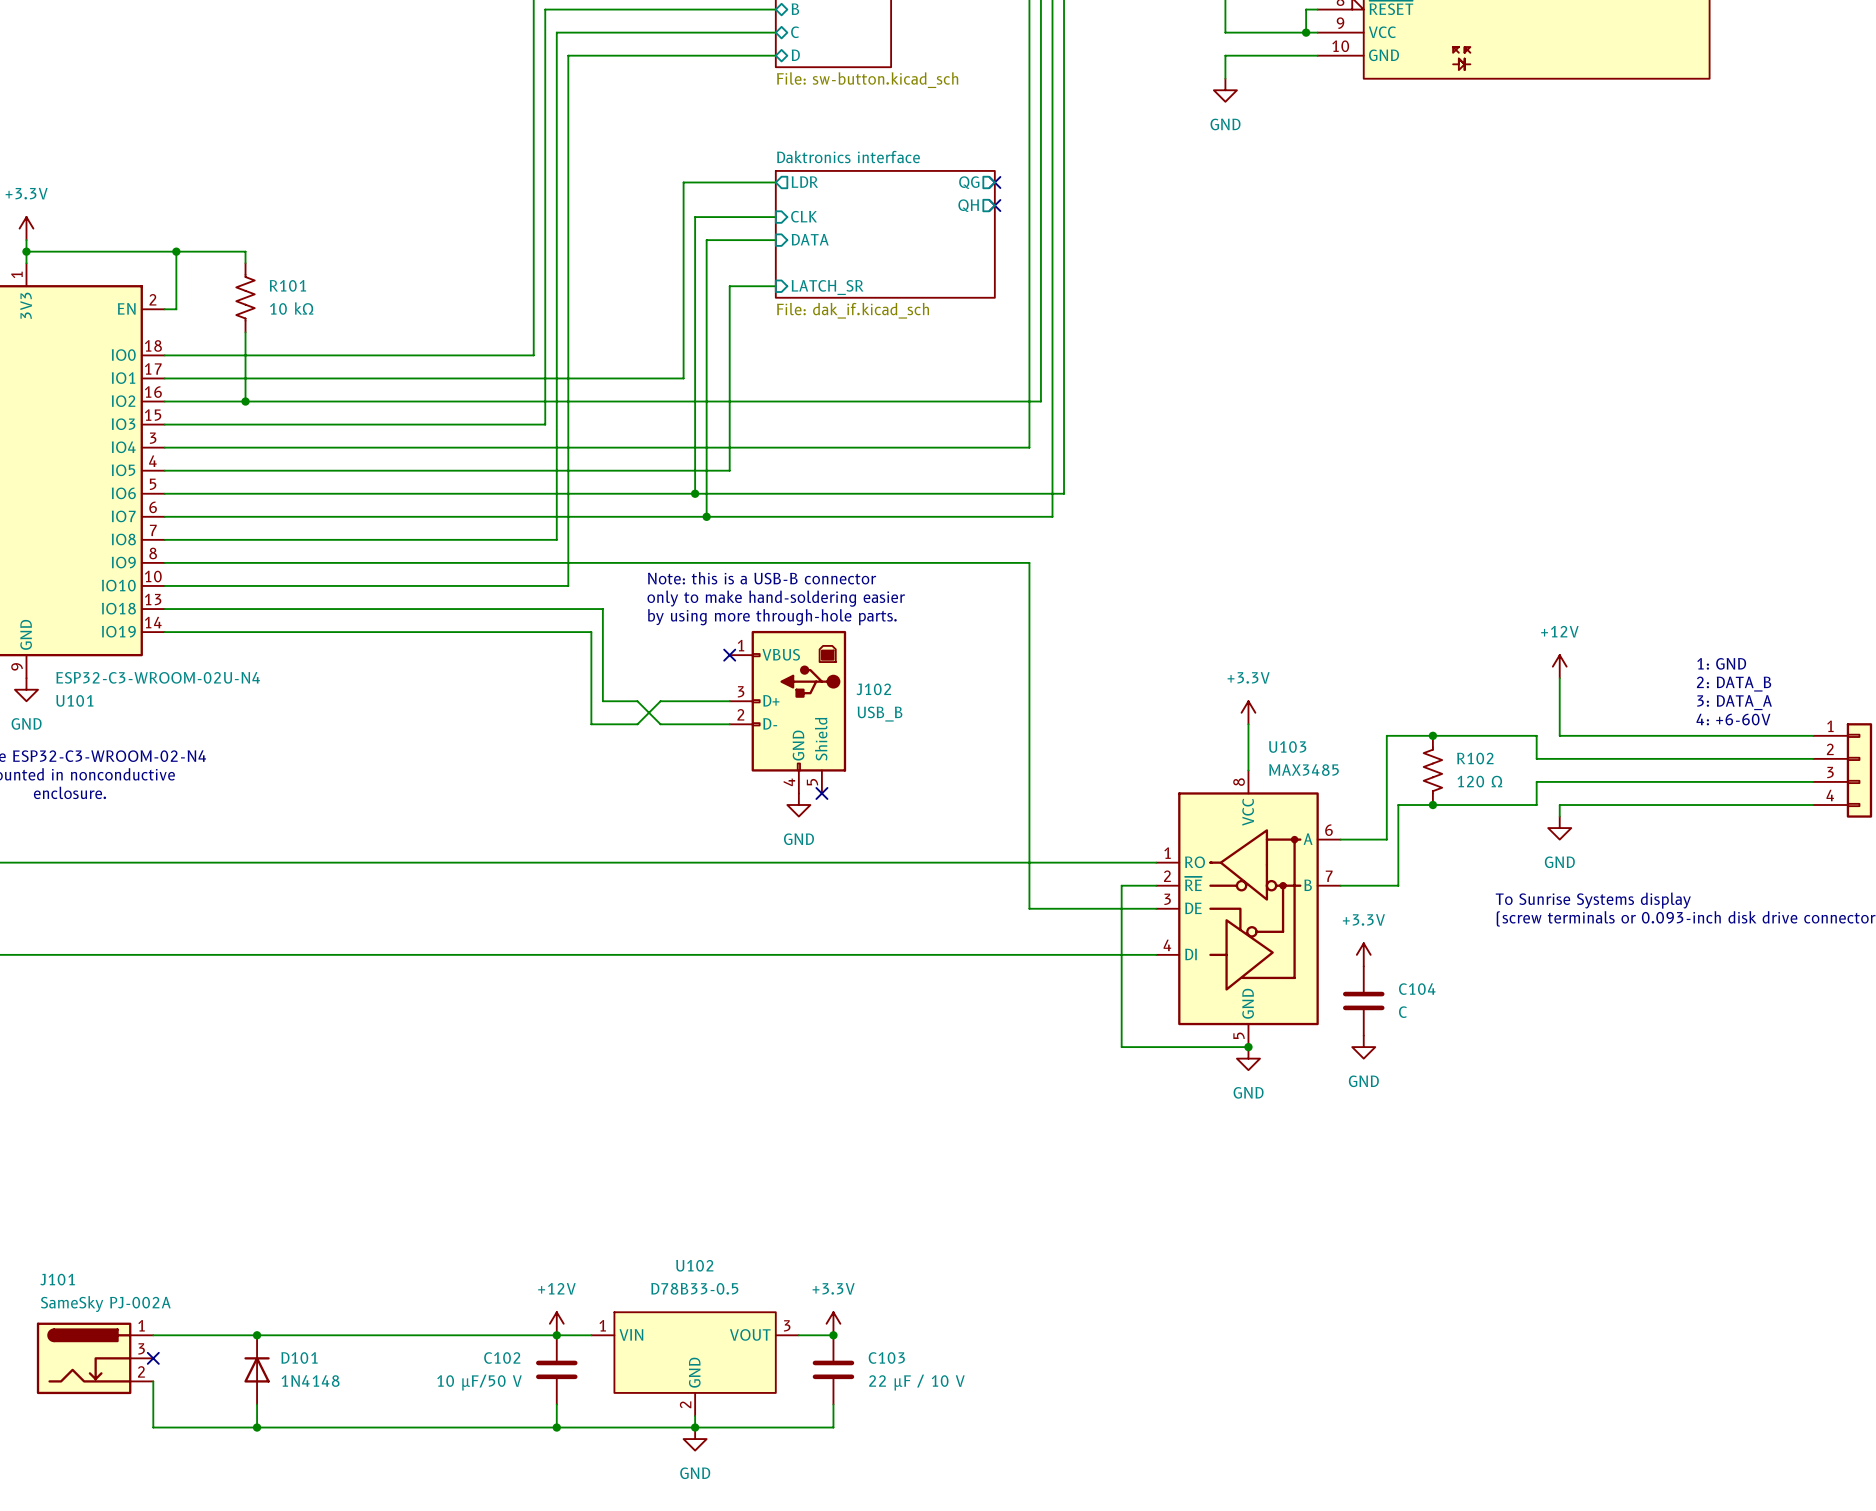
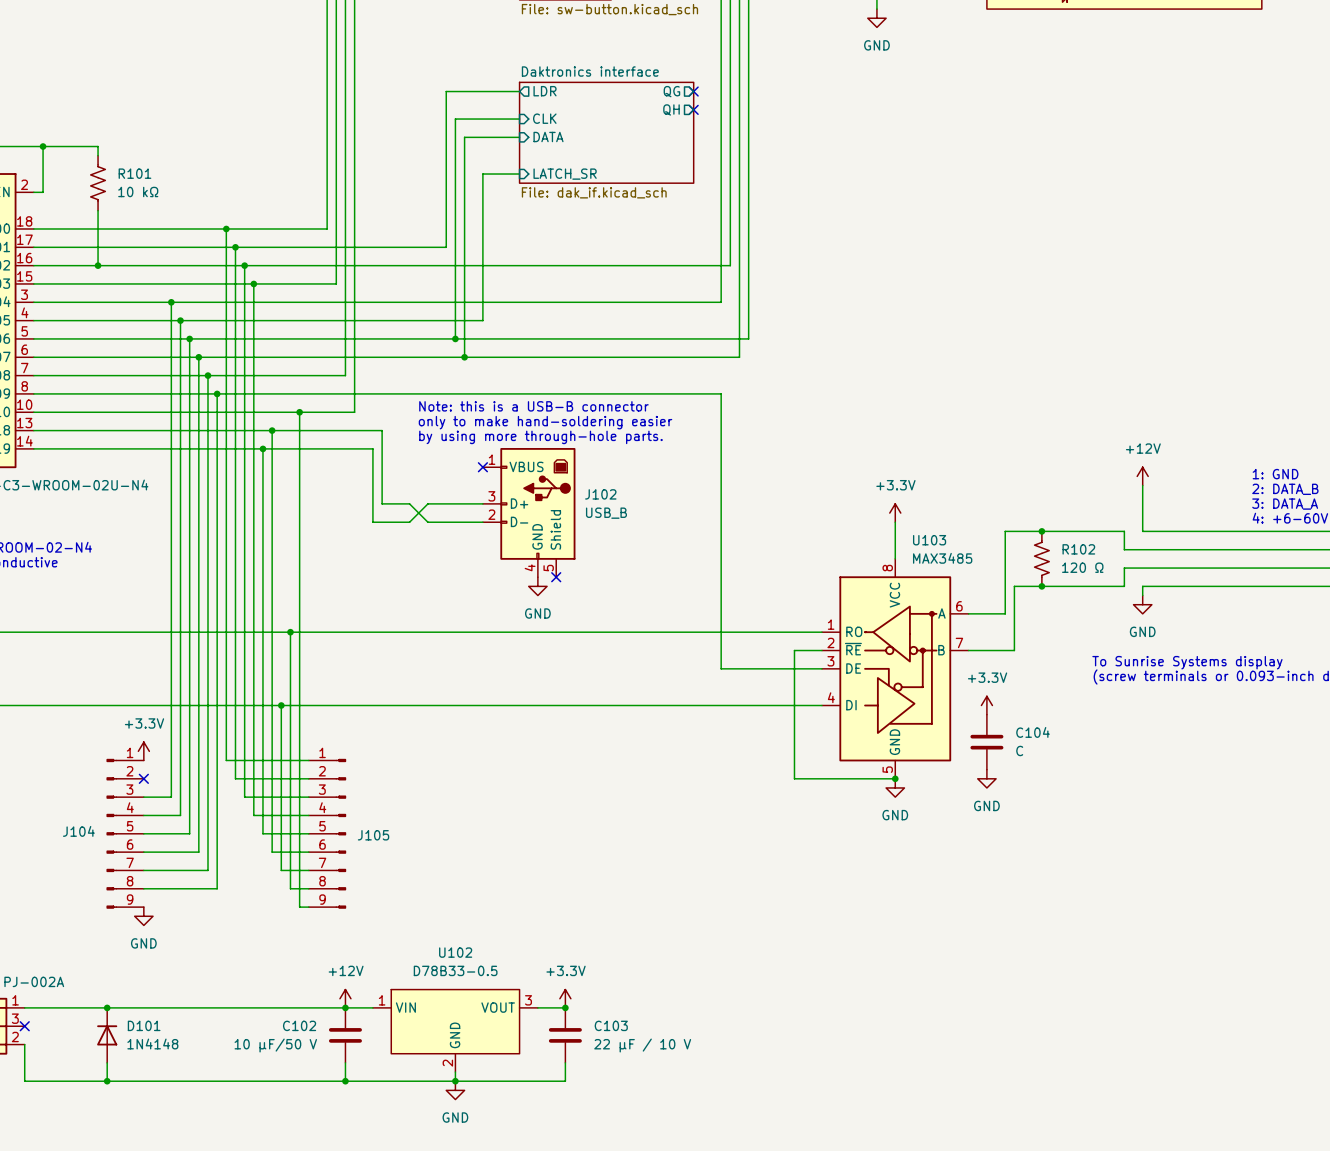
wire: none -> (226, 228) (226, 760) (308, 760)
junction: none -> (226, 228)
wire: none -> (235, 247) (235, 778) (308, 778)
junction: none -> (235, 247)
wire: none -> (244, 265) (244, 797) (308, 797)
junction: none -> (244, 265)
wire: none -> (253, 283) (253, 815) (308, 815)
junction: none -> (253, 283)
wire: none -> (171, 302) (171, 797) (143, 797)
junction: none -> (171, 302)
wire: none -> (180, 320) (180, 815) (143, 815)
junction: none -> (180, 320)
wire: none -> (189, 338) (189, 833) (143, 833)
junction: none -> (189, 338)
wire: none -> (198, 357) (198, 852) (143, 852)
junction: none -> (198, 357)
wire: none -> (207, 375) (207, 870) (143, 870)
junction: none -> (207, 375)
wire: none -> (217, 393) (217, 888) (143, 888)
junction: none -> (217, 393)
wire: none -> (299, 412) (299, 907) (308, 907)
junction: none -> (299, 412)
wire: none -> (272, 430) (272, 852) (308, 852)
junction: none -> (272, 430)
wire: none -> (262, 448) (262, 833) (308, 833)
junction: none -> (262, 448)
wire: none -> (290, 632) (290, 888) (308, 888)
junction: none -> (290, 632)
wire: none -> (281, 705) (281, 870) (308, 870)
junction: none -> (281, 705)
power symbol: none -> +3.3V (143, 751)
no-connect mark: none -> (143, 778)
J104: none -> (125, 833)
J105: none -> (327, 833)
power symbol: none -> GND (143, 916)

